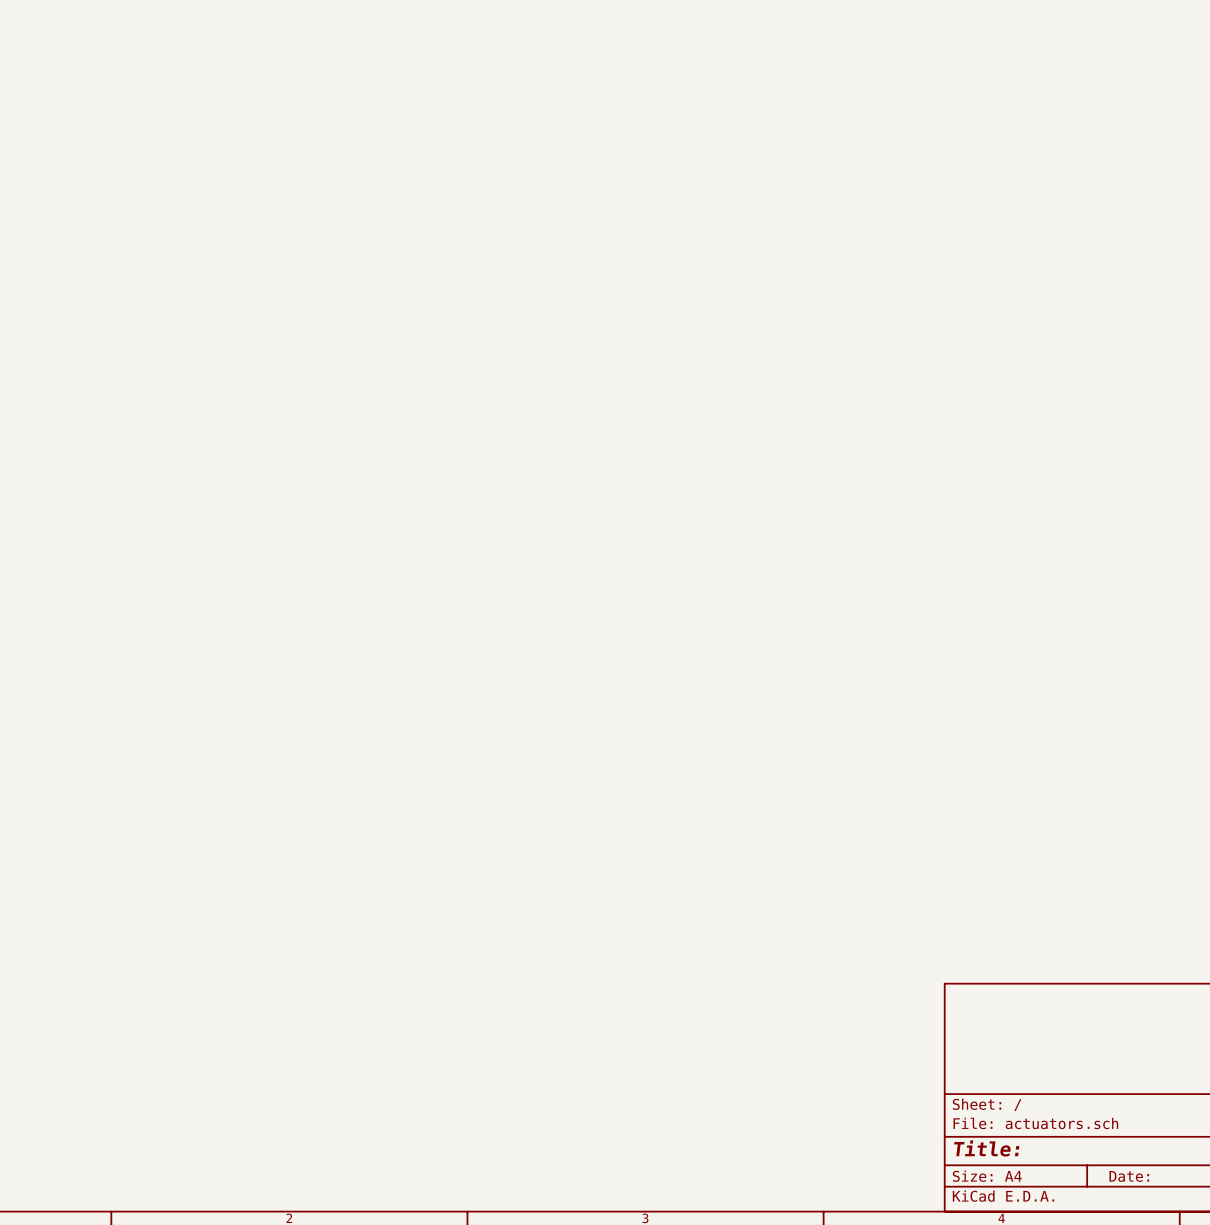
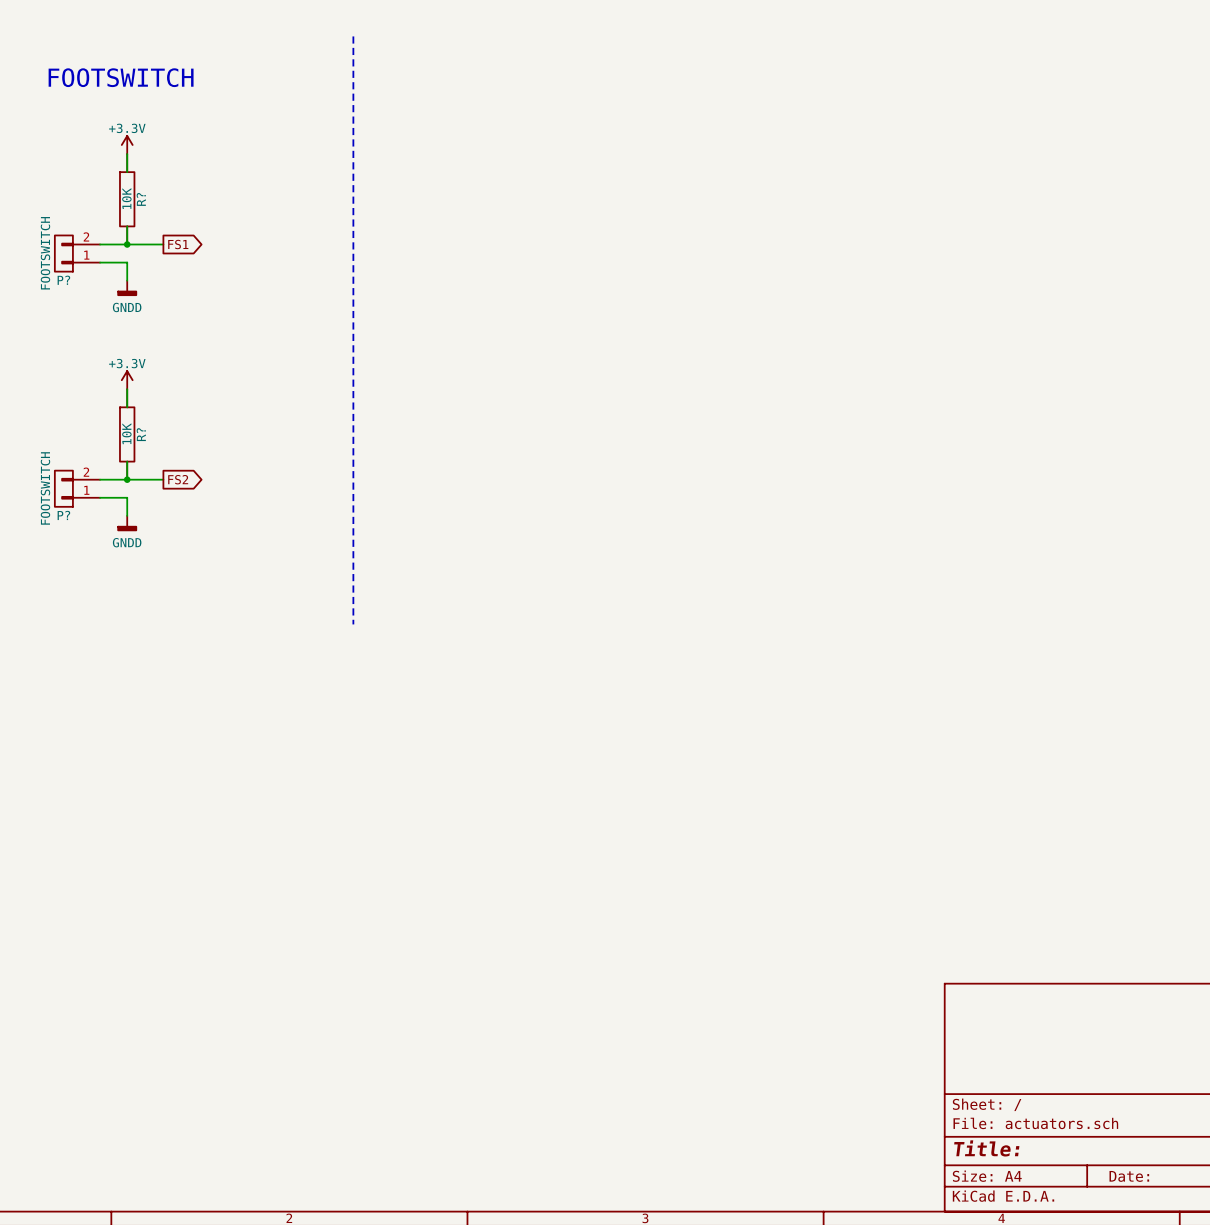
line: none -> (353, 36) (353, 624)
text: none -> FOOTSWITCH (121, 77)
power symbol: none -> +3.3V (127, 144)
wire: none -> (127, 154) (127, 172)
R?: none -> 10K (127, 199)
wire: none -> (127, 226) (127, 244)
wire: none -> (100, 244) (163, 244)
junction: none -> (127, 244)
global label: none -> FS1 (178, 244)
P?: none -> FOOTSWITCH (77, 253)
wire: none -> (100, 262) (127, 262) (127, 280)
power symbol: none -> GNDD (127, 288)
power symbol: none -> +3.3V (127, 380)
wire: none -> (127, 389) (127, 407)
R?: none -> 10K (127, 434)
wire: none -> (127, 461) (127, 479)
wire: none -> (100, 479) (163, 479)
junction: none -> (127, 479)
global label: none -> FS2 (178, 479)
P?: none -> FOOTSWITCH (77, 488)
wire: none -> (100, 497) (127, 497) (127, 515)
power symbol: none -> GNDD (127, 523)

